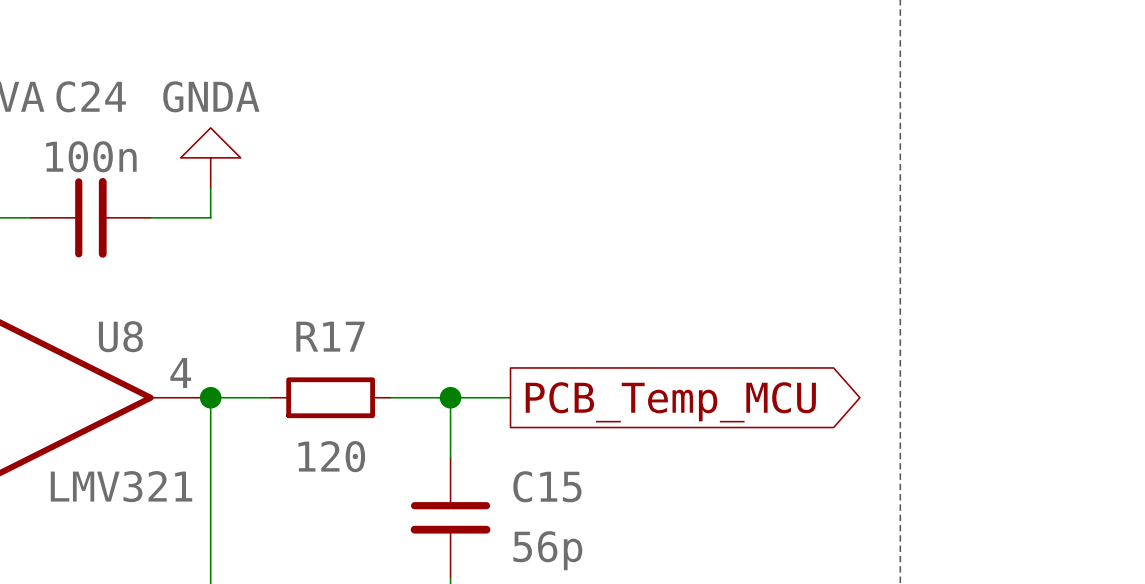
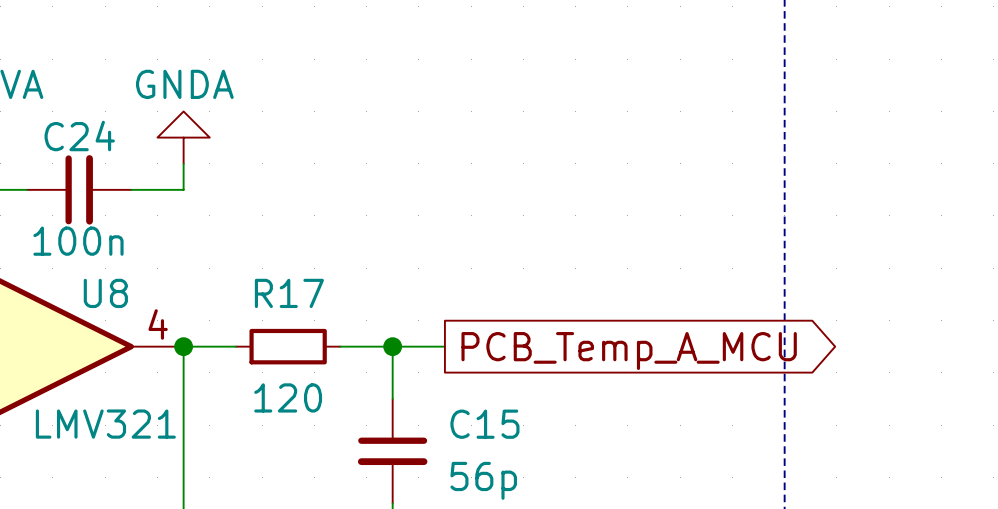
C24 name position: C24 (91, 96) -> C24 (79, 136)
C24 value position: 100n (91, 156) -> 100n (78, 241)
global label: PCB_Temp_MCU (670, 402) -> PCB_Temp_A_MCU (629, 351)

